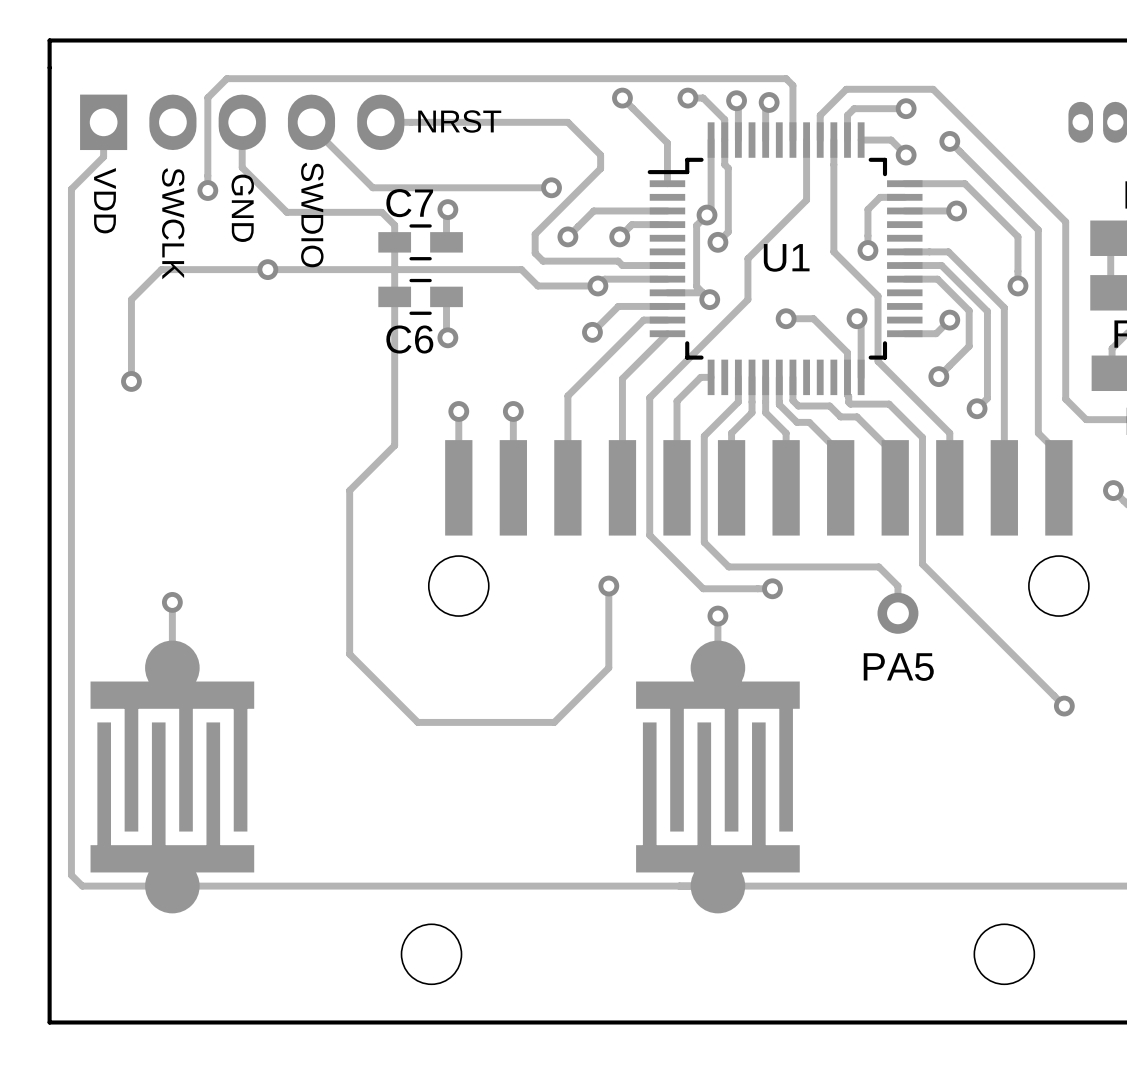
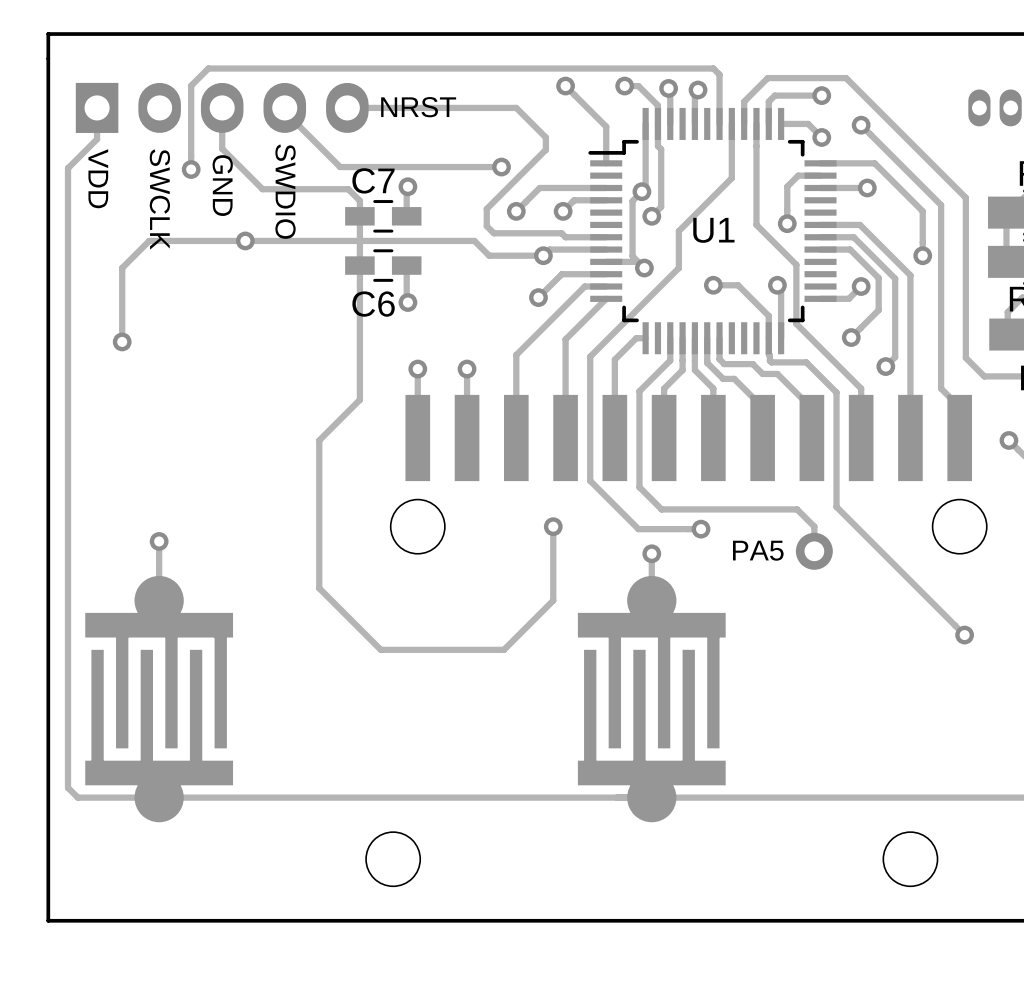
text: none -> PA5 (758, 550)
PA5 name: PA5 (898, 667) -> none

